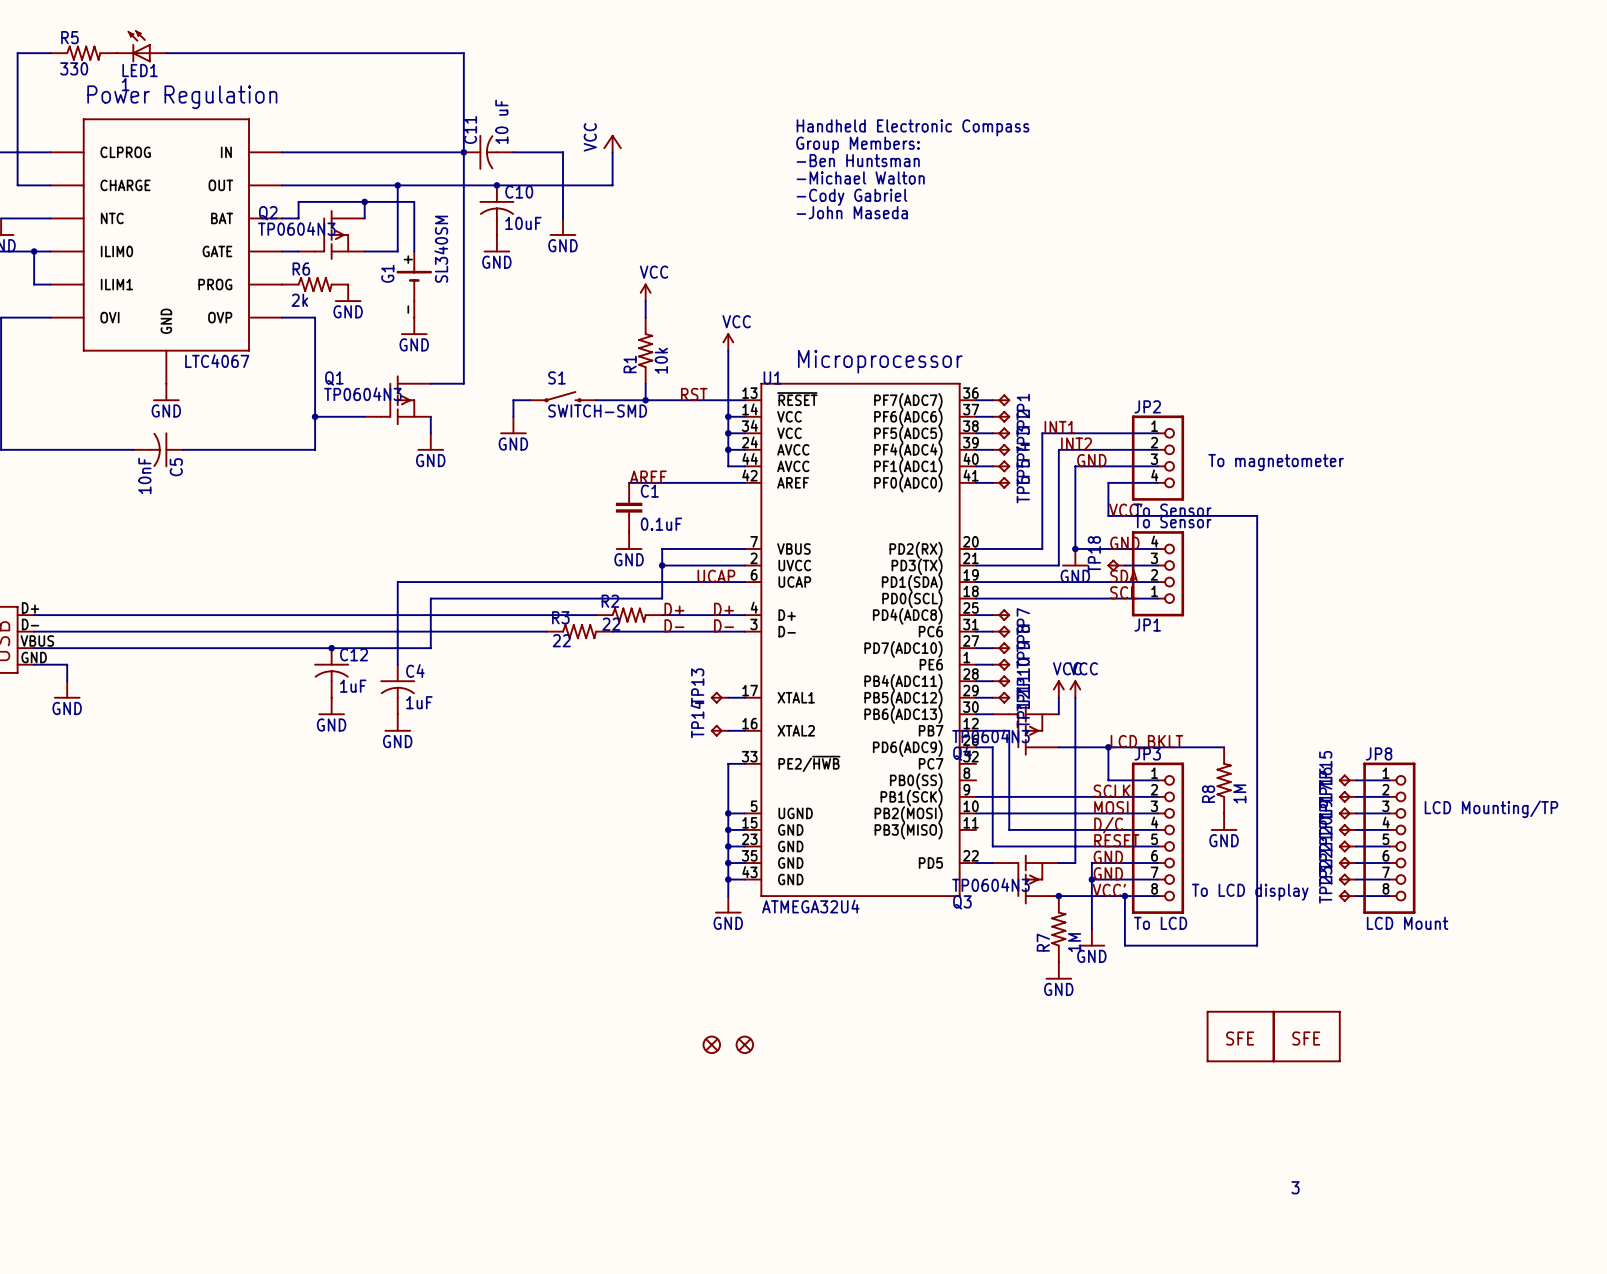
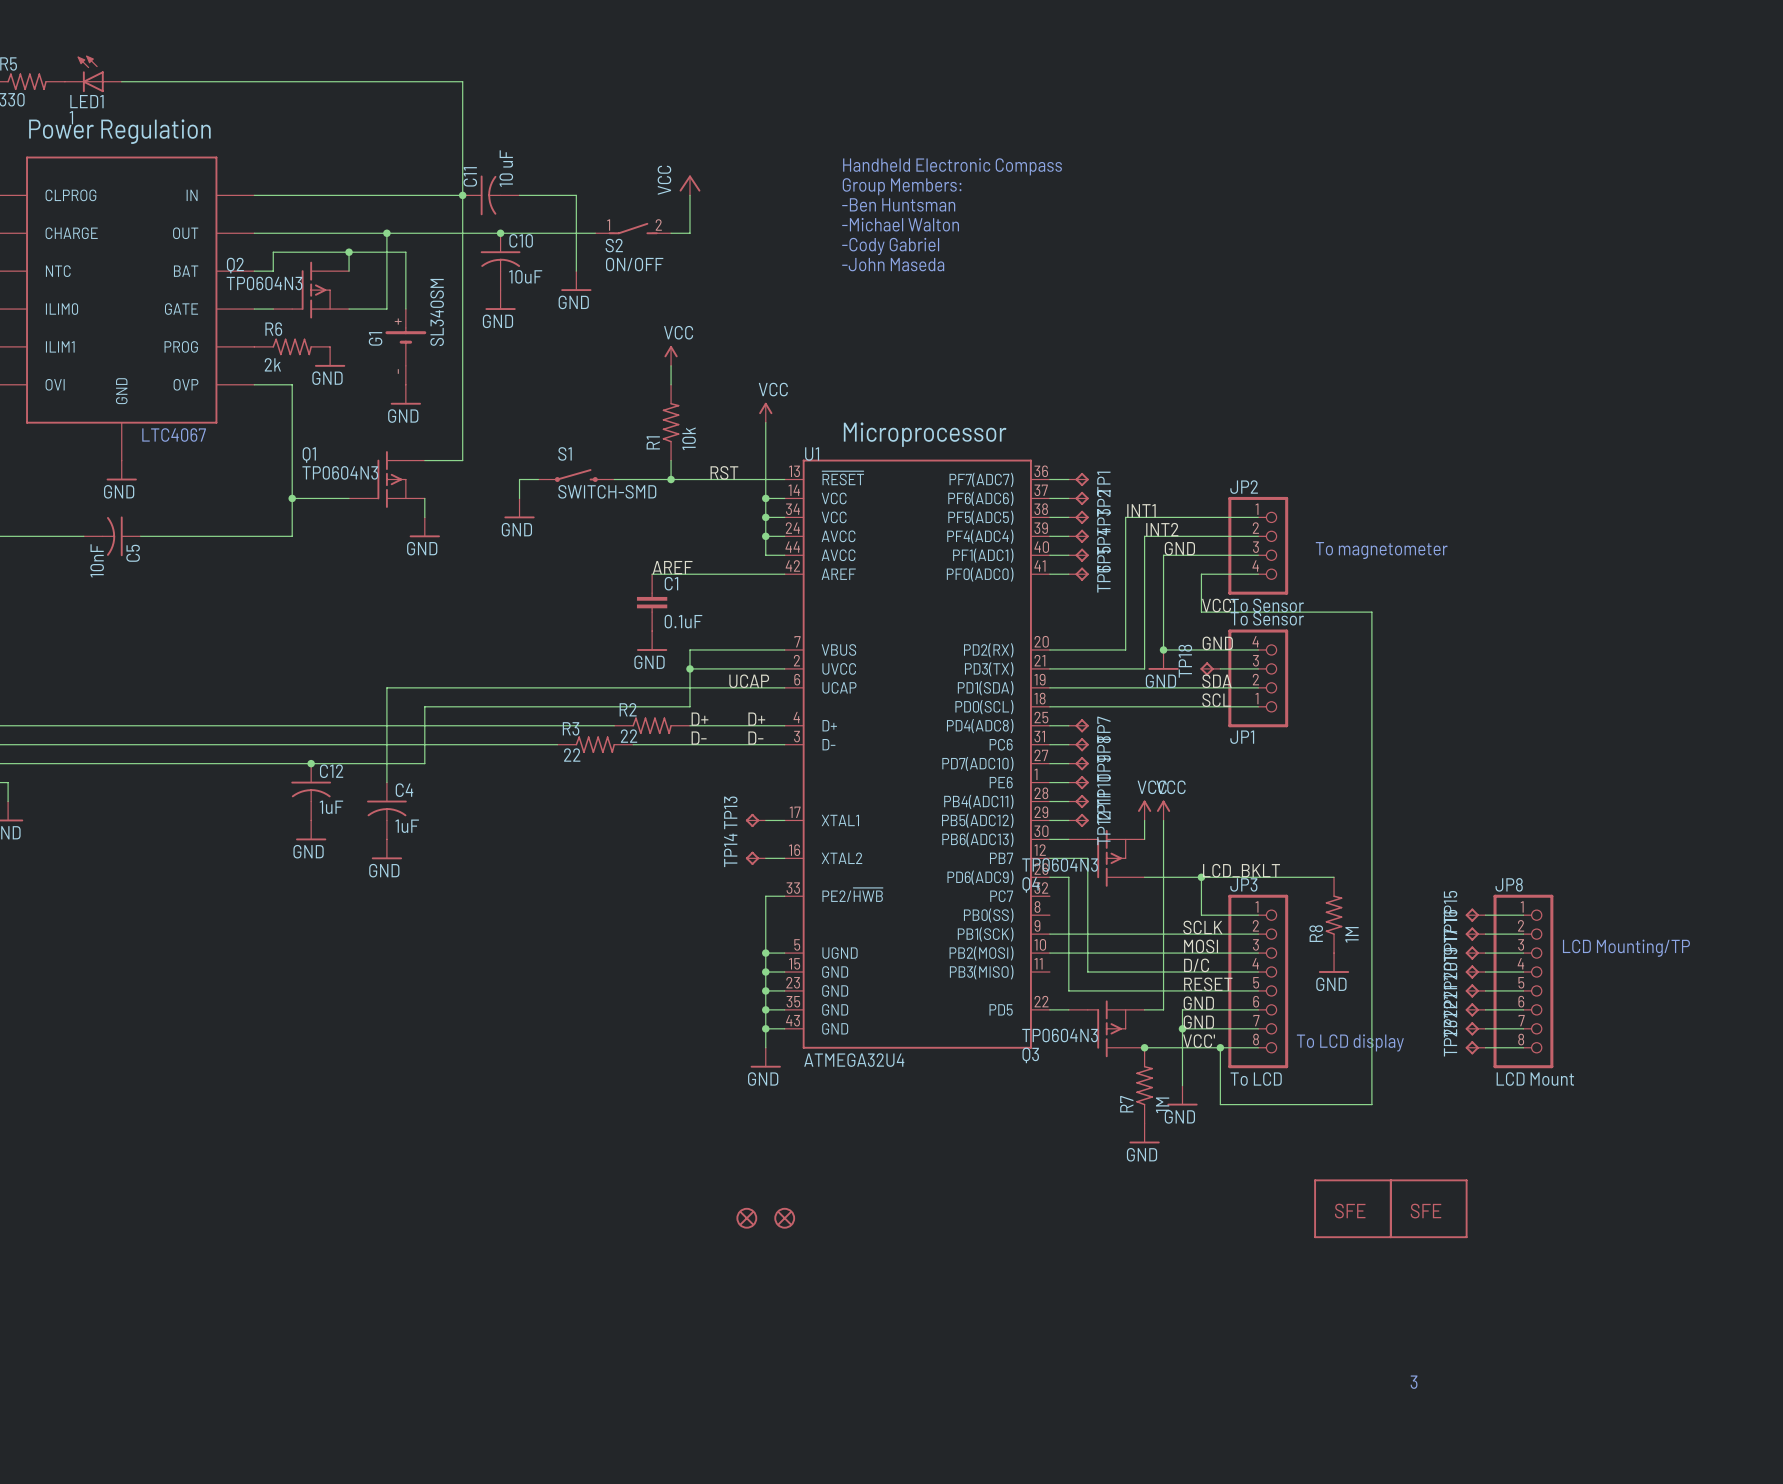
power symbol position: VCC (612, 143) -> VCC (689, 185)
wire: (612, 152) (612, 185) (579, 185) -> none
wire: none -> (689, 195) (689, 233) (671, 233)
S2: none -> ON/OFF (633, 228)

